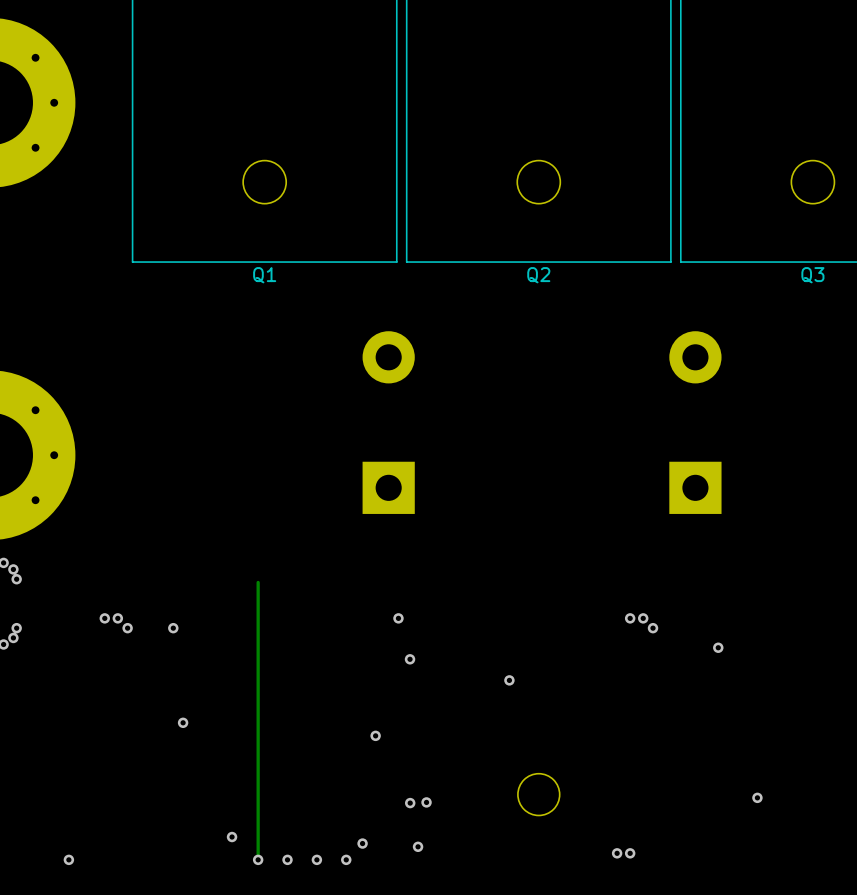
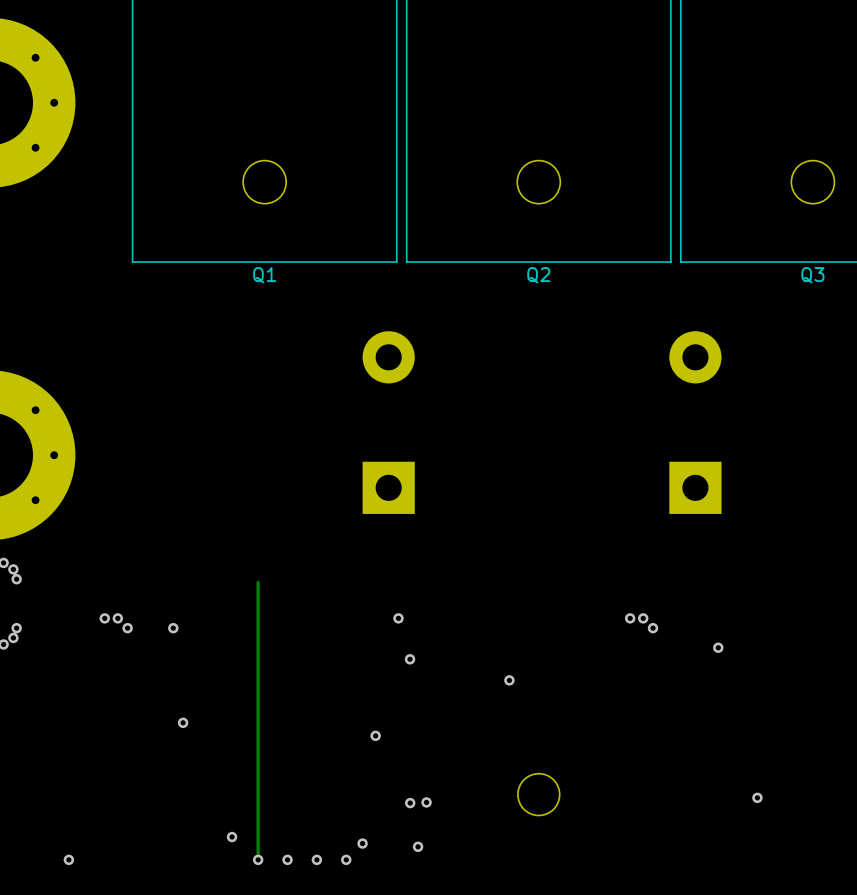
via: (617, 853) -> none
via: (630, 853) -> none

